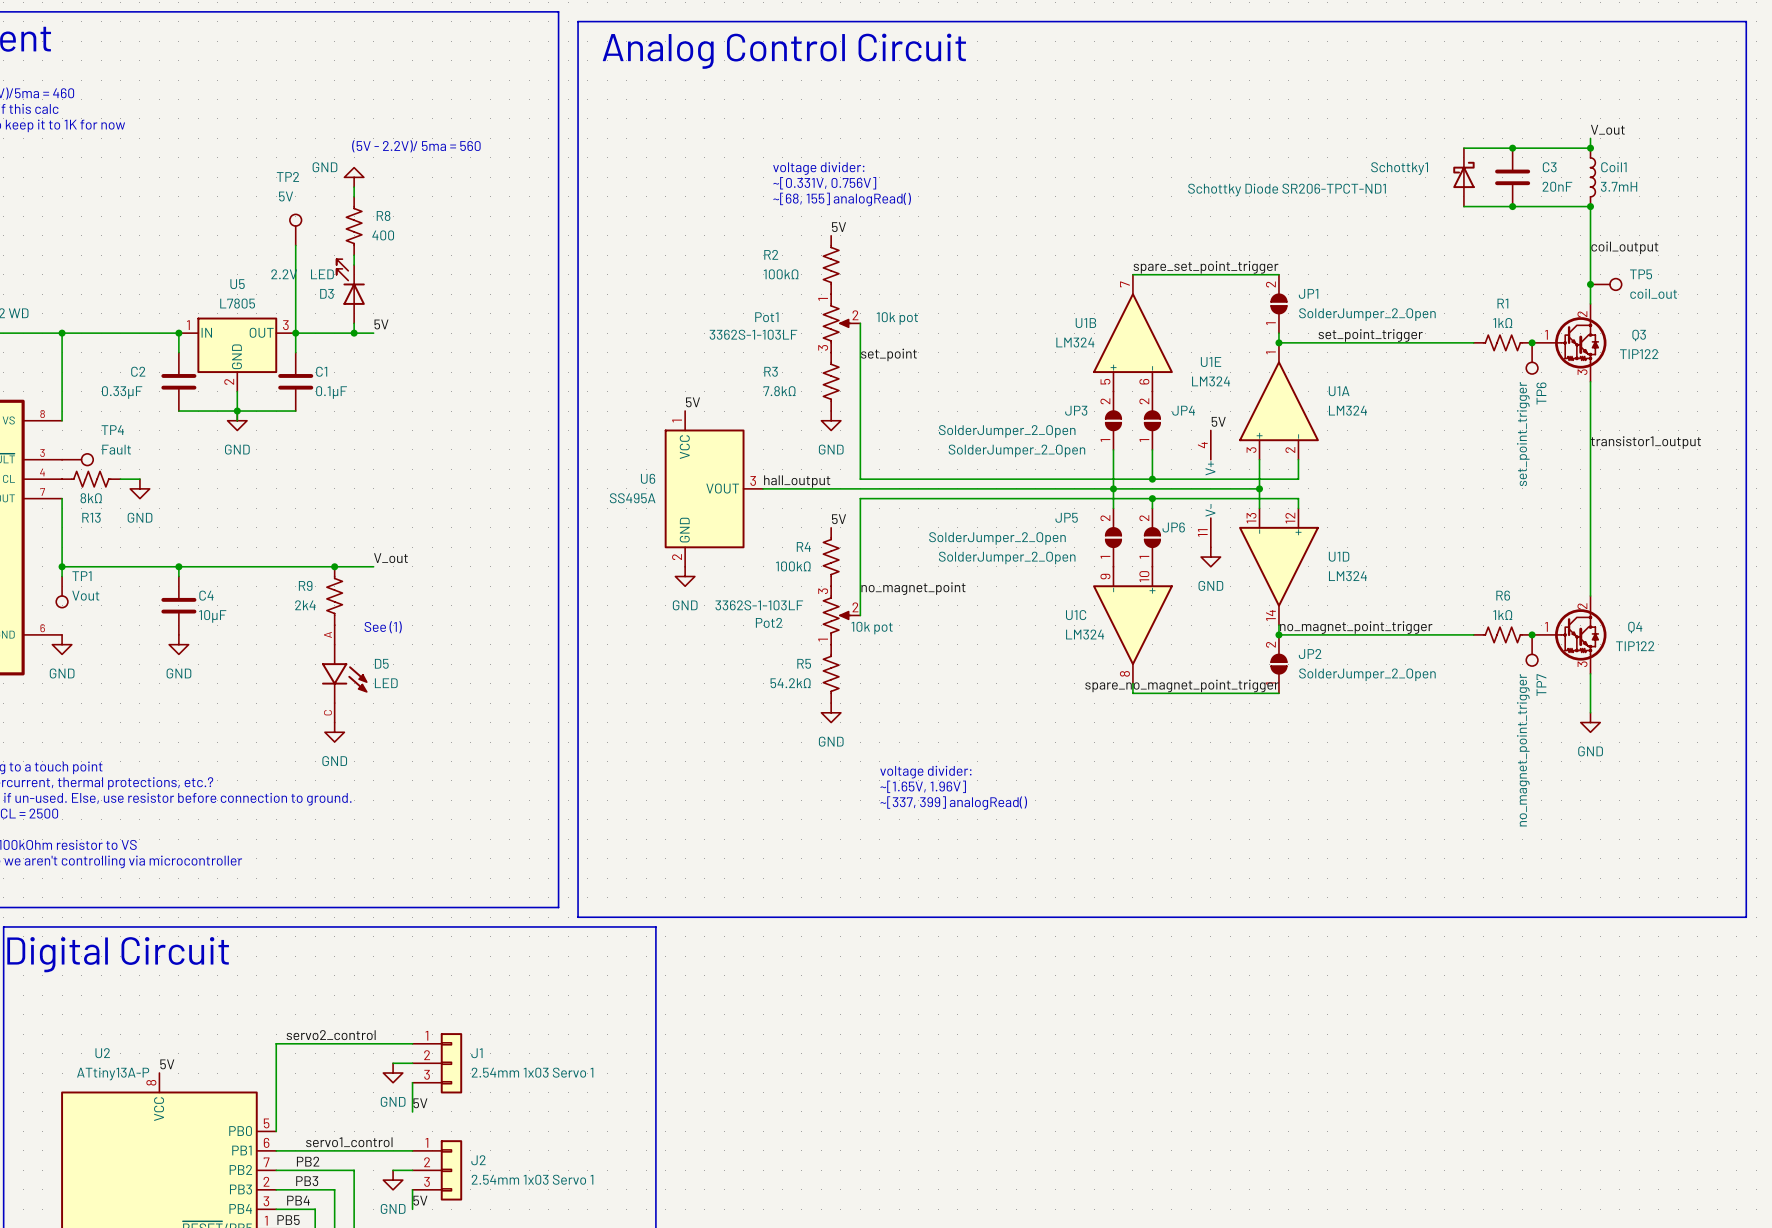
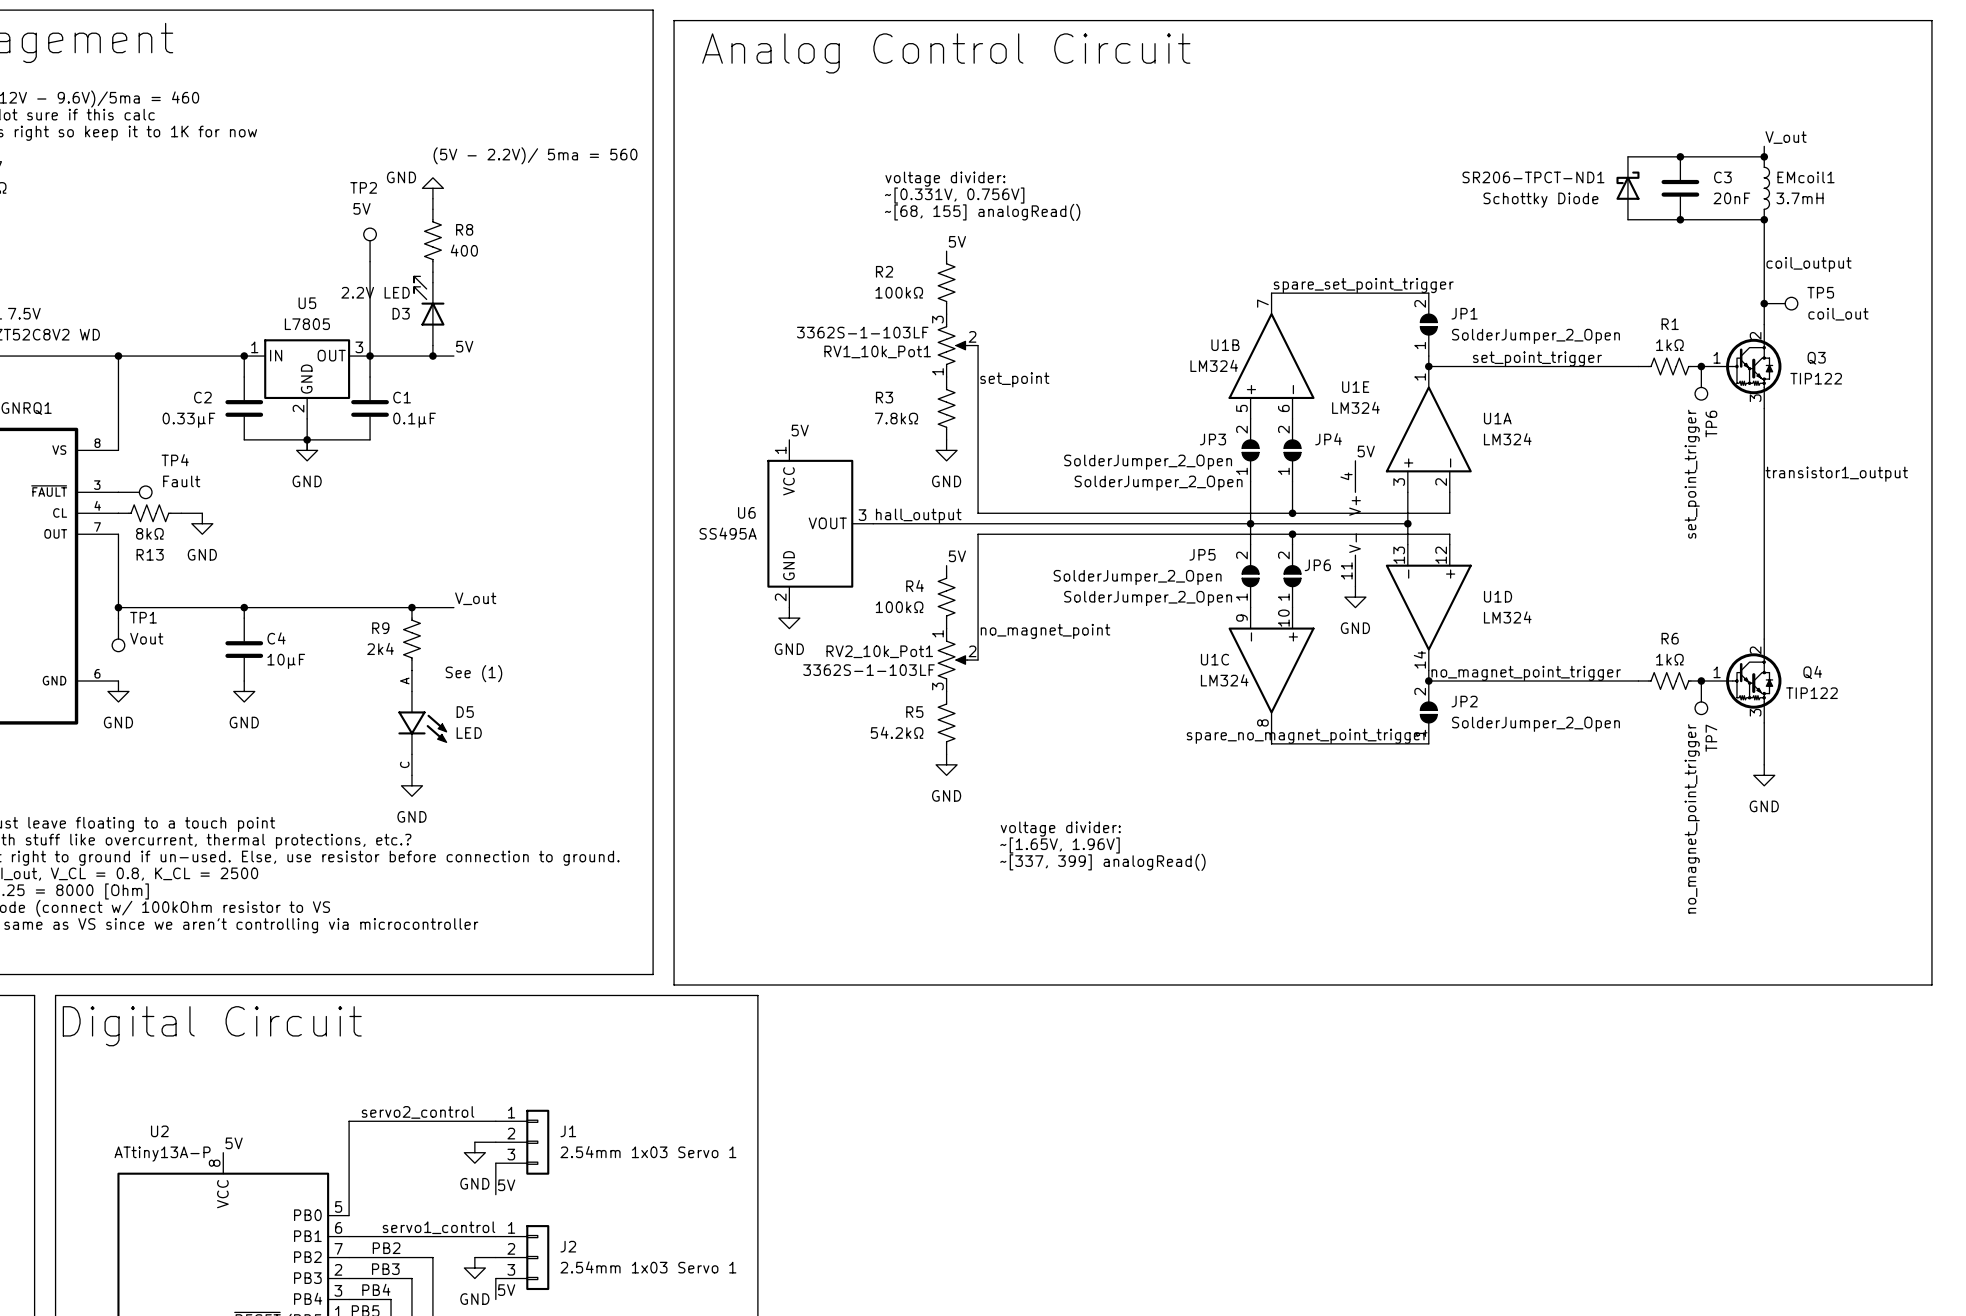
Coil1 name: Coil1 (1613, 167) -> EMcoil1 (1806, 177)
Schottky1 name: Schottky1 (1399, 168) -> SR206-TPCT-ND1 (1533, 177)
Schottky1 value: Schottky Diode SR206-TPCT-ND1 (1287, 190) -> Schottky Diode (1540, 200)
Pot1: 3362S-1-103LF (841, 323) -> none
RV1_10k_Pot1: none -> 3362S-1-103LF (958, 345)
Pot2: 3362S-1-103LF (841, 615) -> none
RV2_10k_Pot1: none -> 3362S-1-103LF (958, 660)

